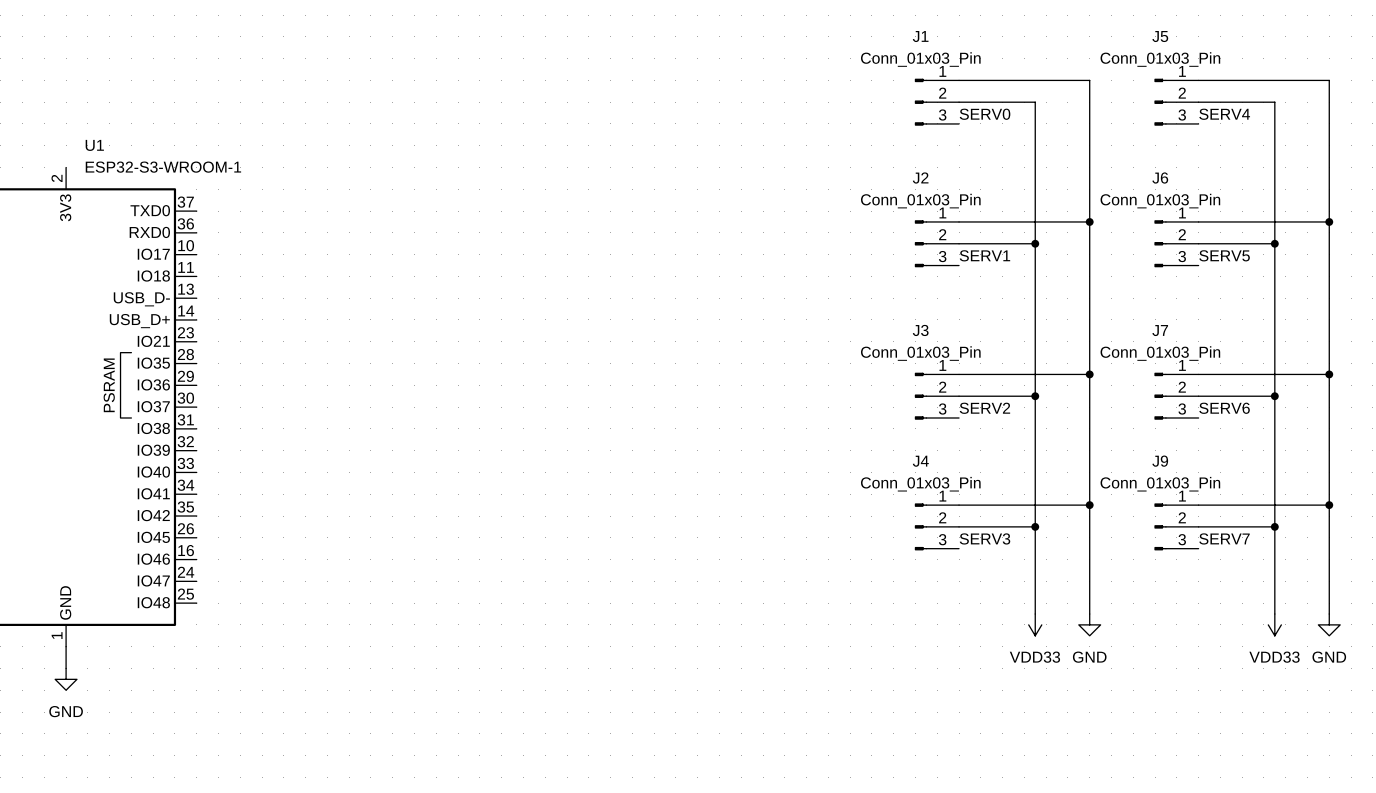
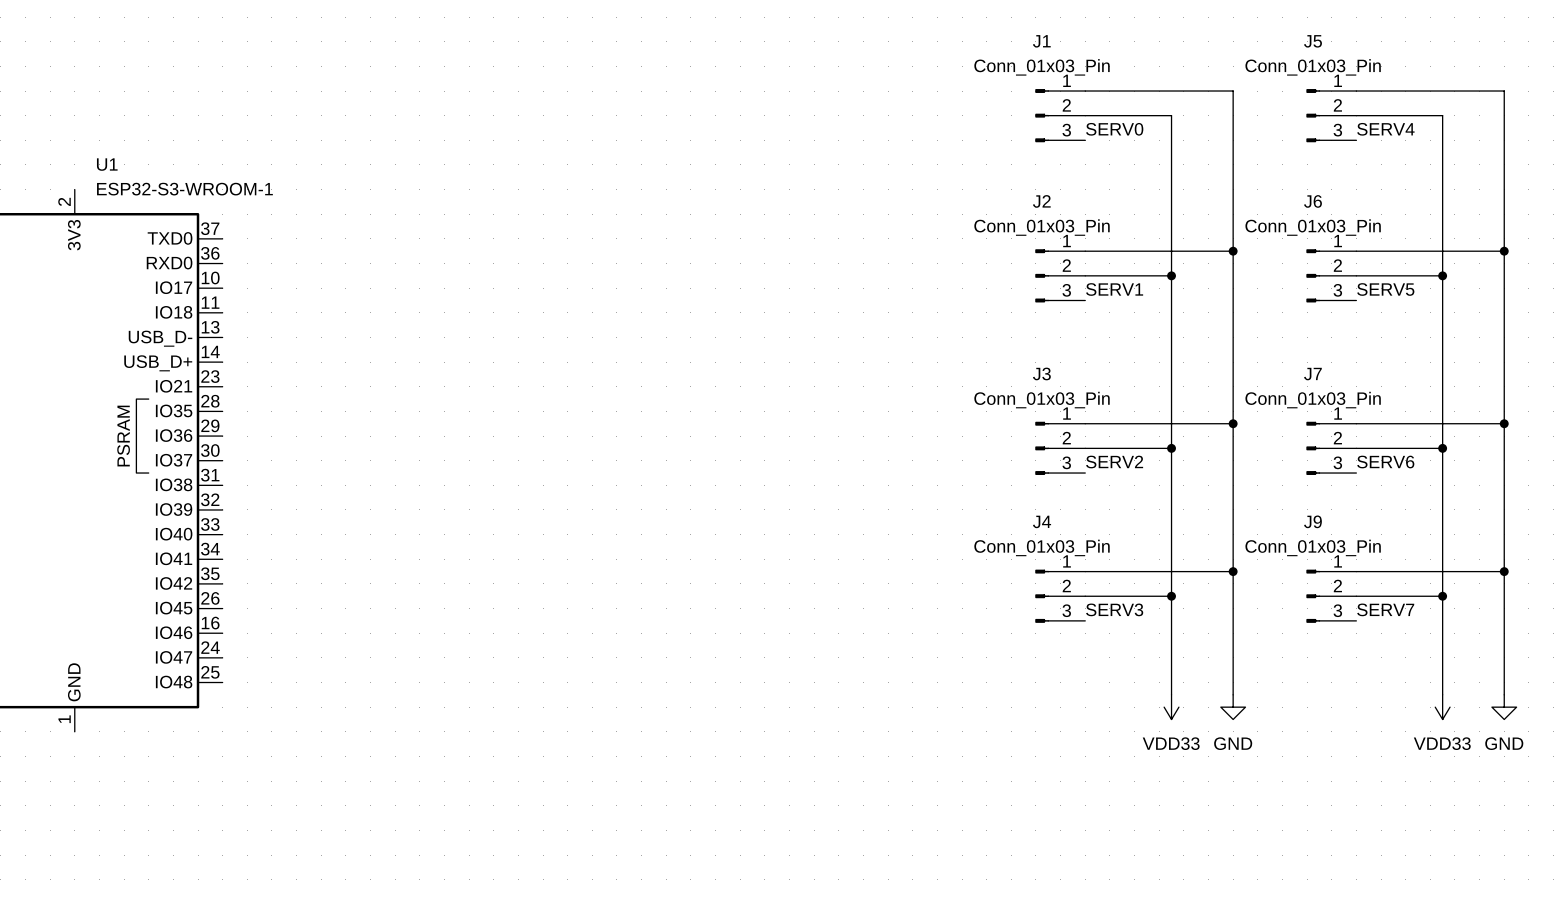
wire: (66, 646) (66, 668) -> none
power symbol: GND (66, 679) -> none

